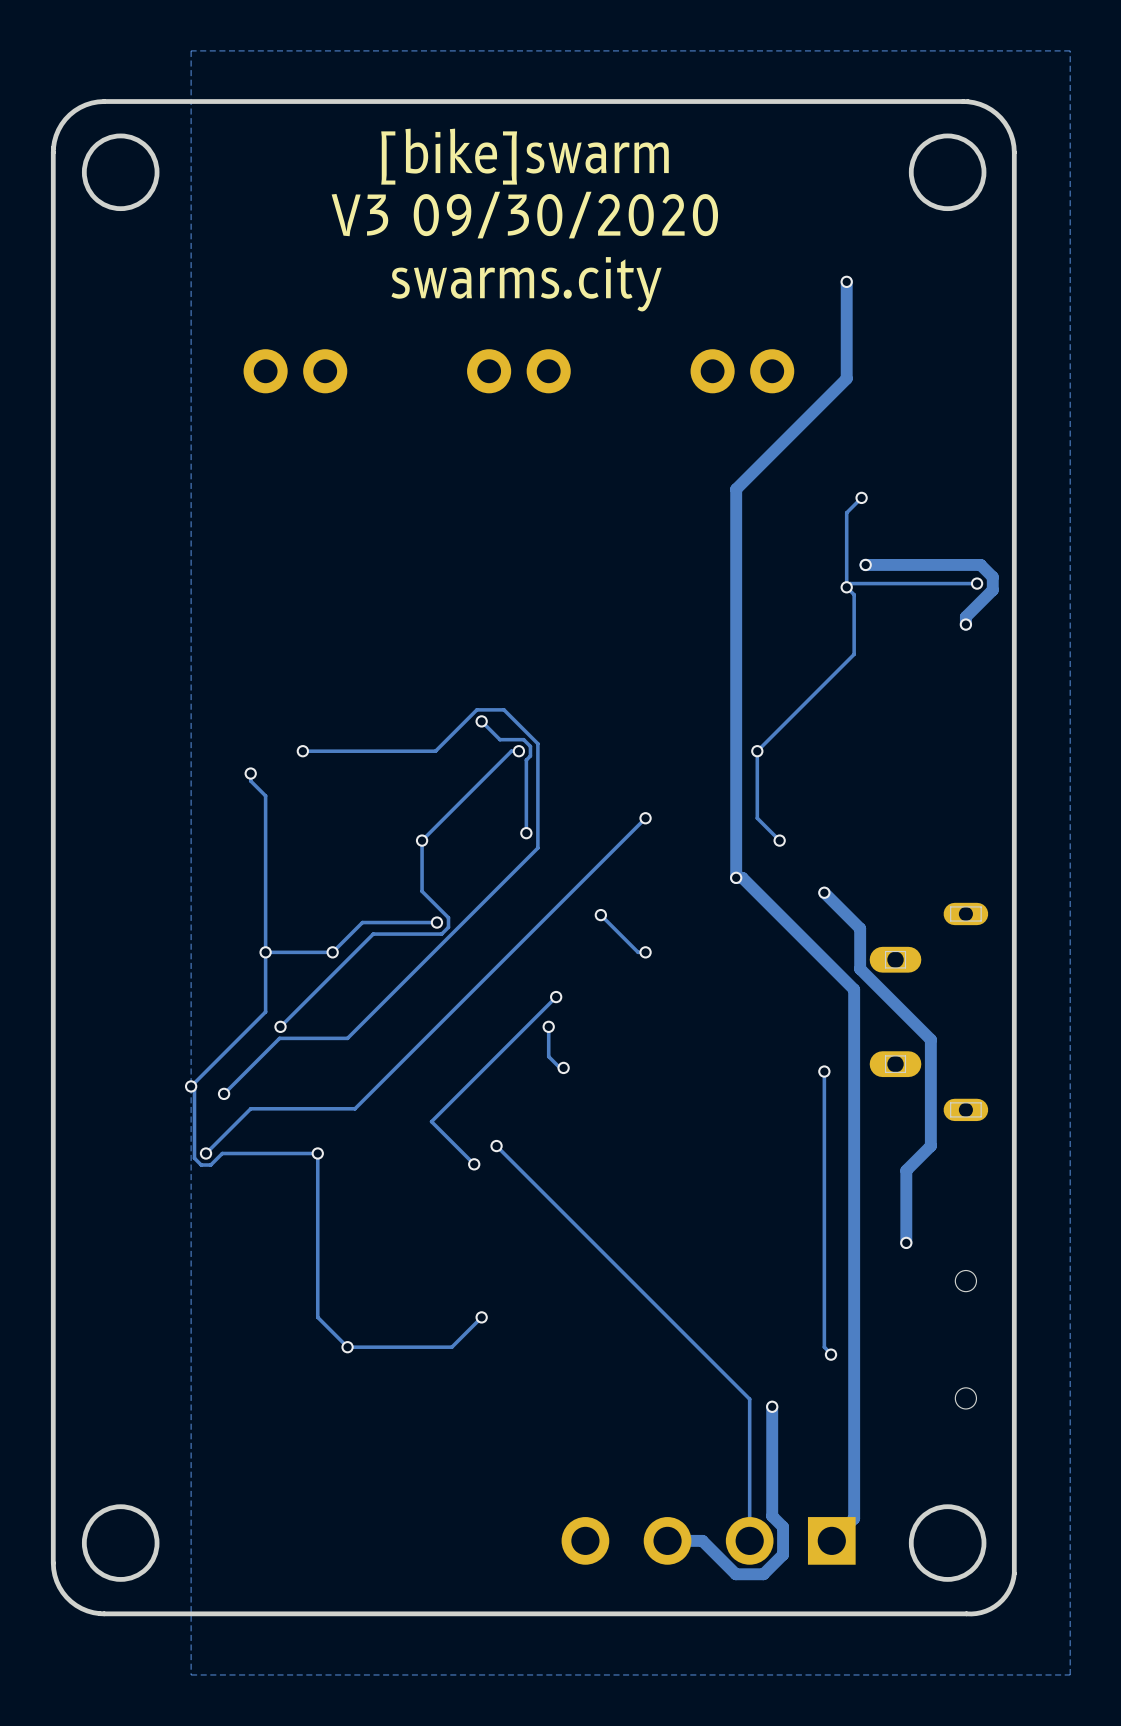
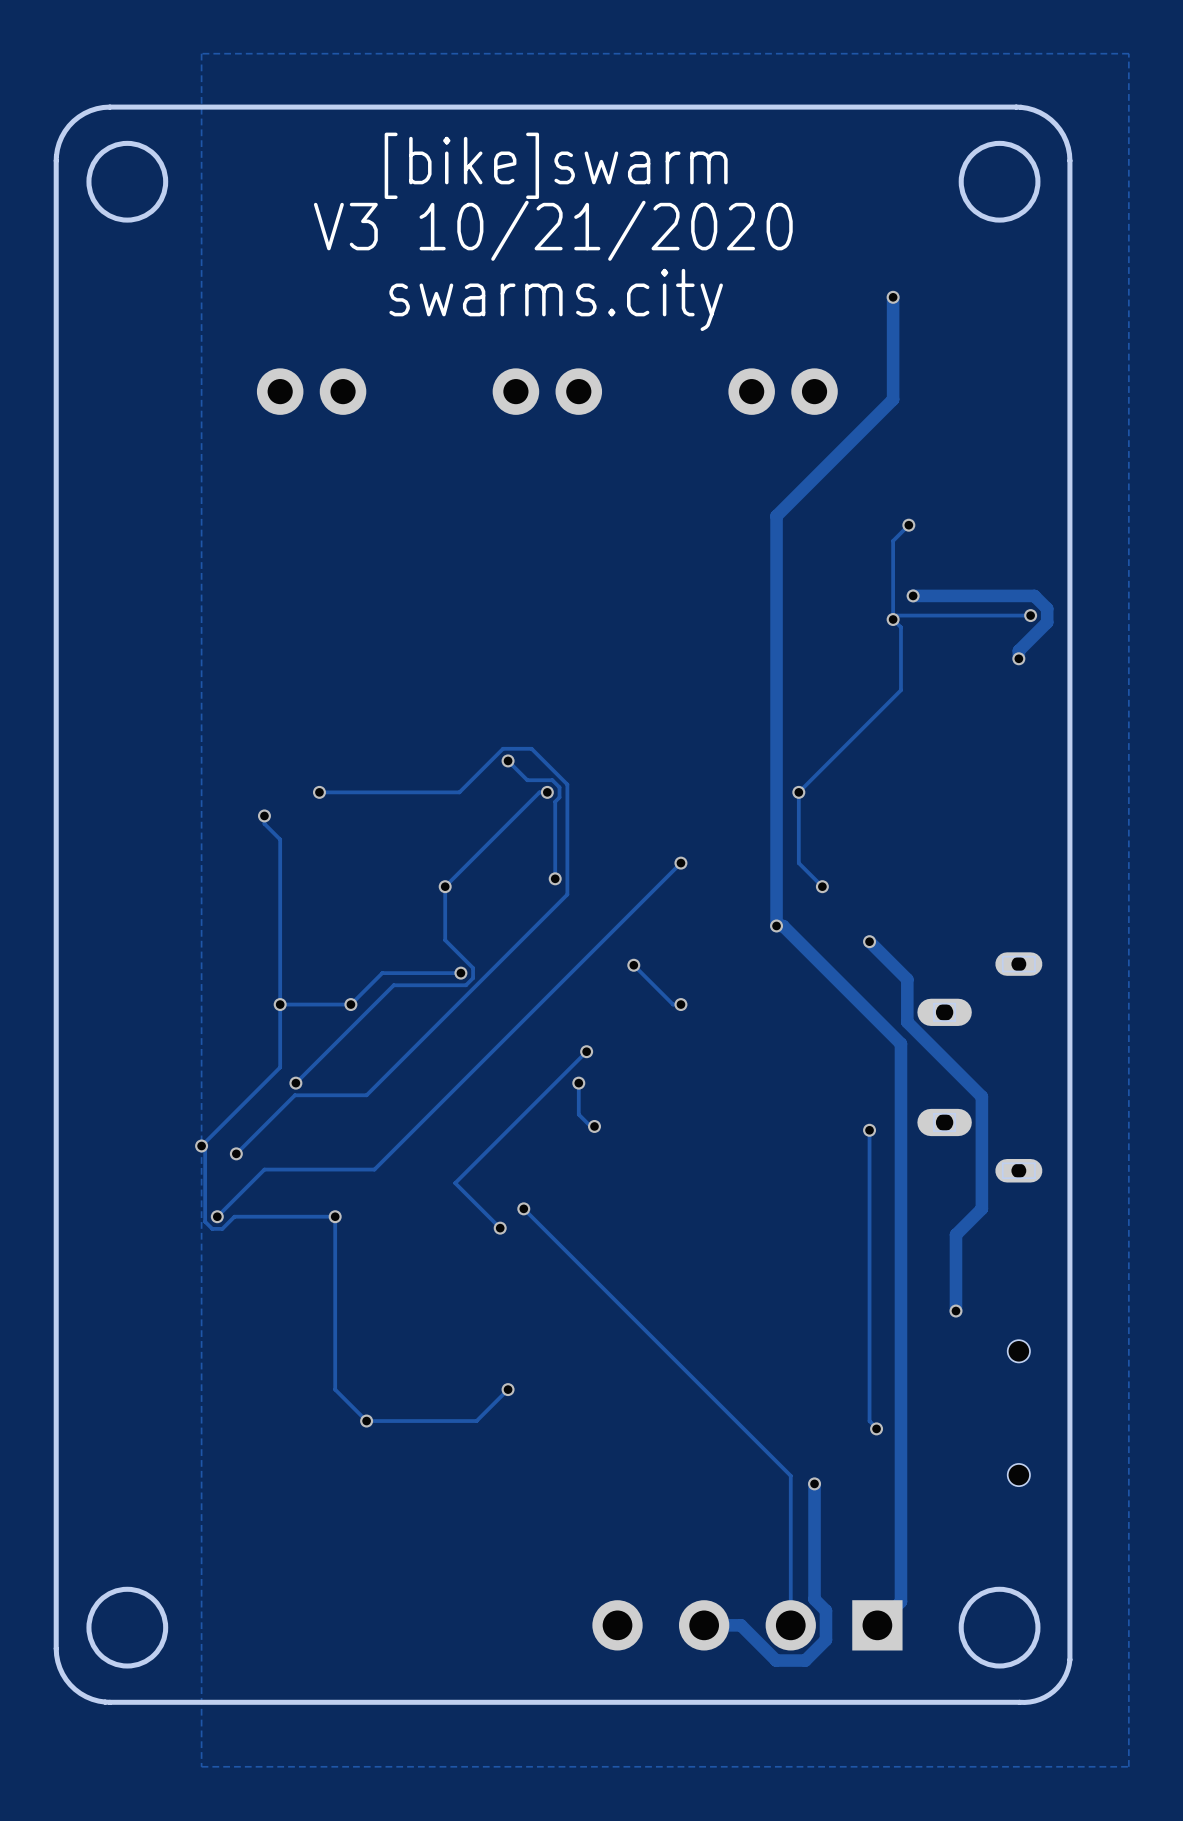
text: V3 09/30/2020 (524, 215) -> V3 10/21/2020 (553, 230)

